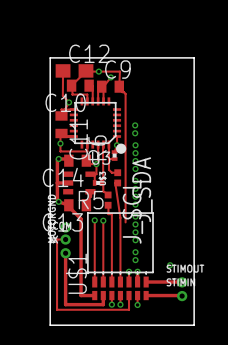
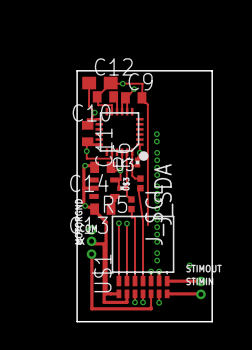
track: (65, 239) (57, 239) (57, 309) (129, 309) -> (91, 257) (91, 308) (151, 308) (151, 307)
track: (65, 253) (65, 304) (78, 304) -> (91, 243) (104, 243) (104, 302)

